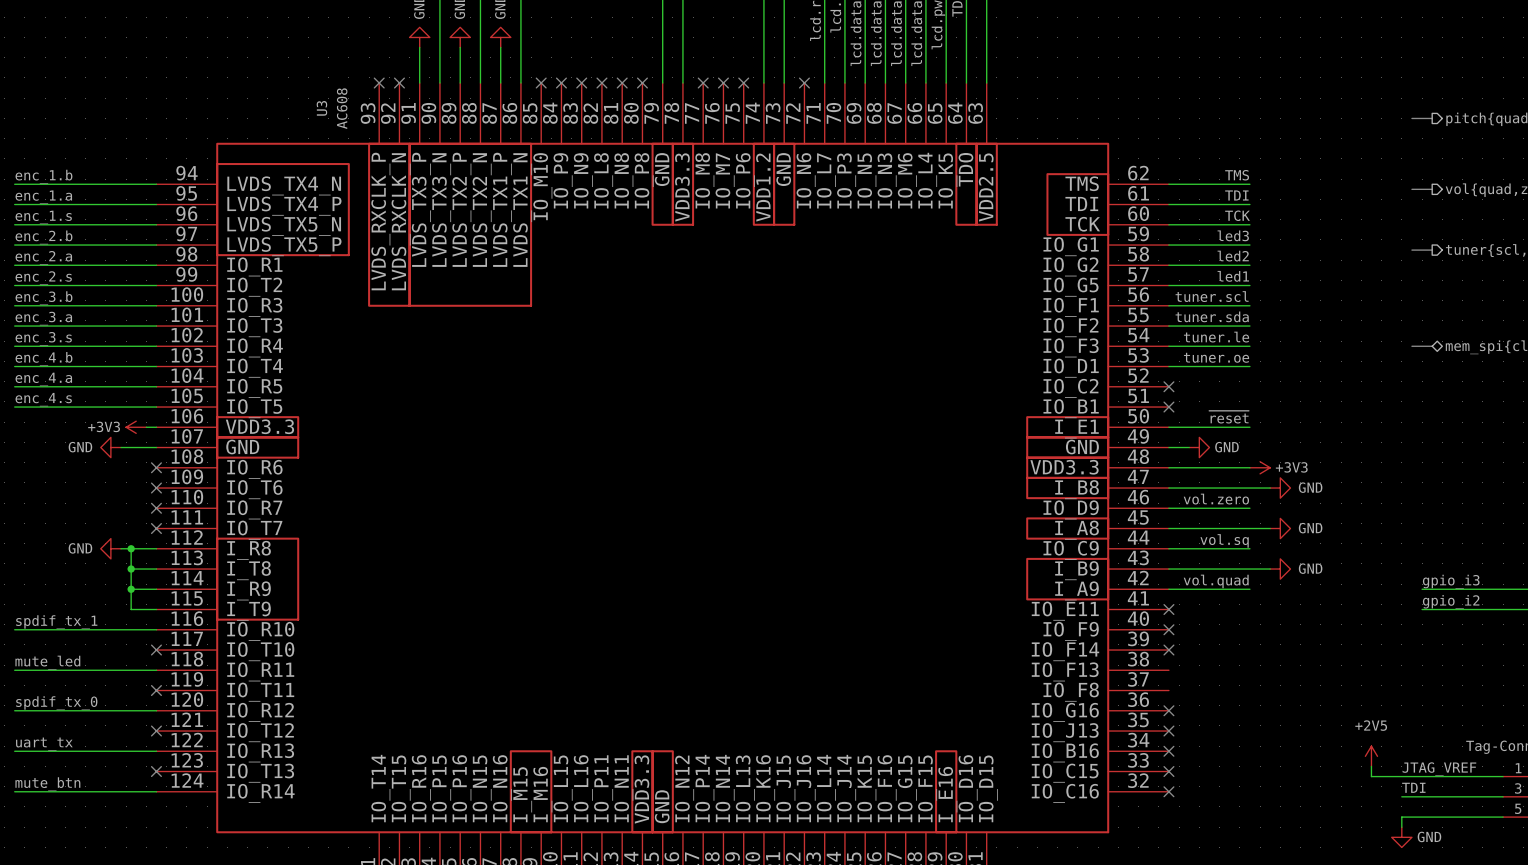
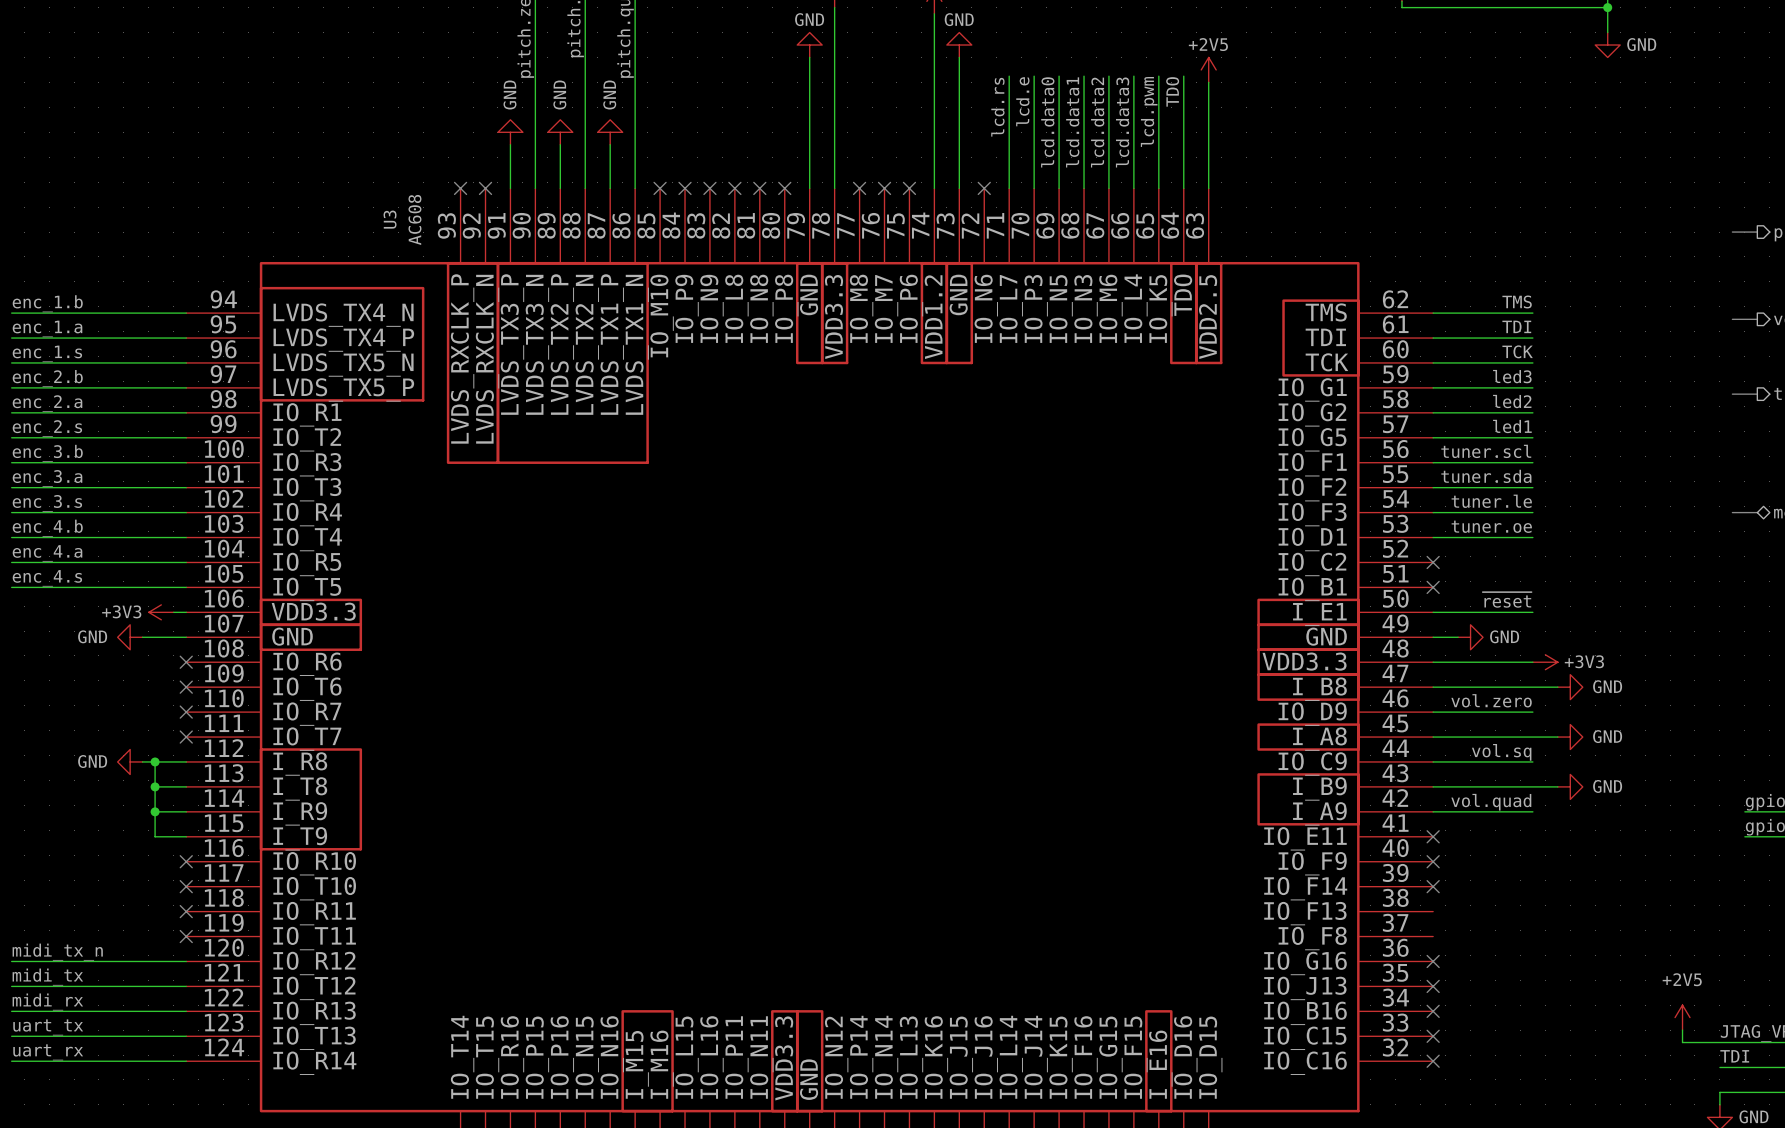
label: spdif_tx_1 (56, 622) -> none
wire: (14, 629) (156, 629) -> (11, 986) (186, 986)
no-connect mark: none -> (186, 861)
label: mute_led (47, 662) -> none
wire: (14, 670) (156, 670) -> (11, 1036) (186, 1036)
no-connect mark: none -> (186, 911)
label: spdif_tx_0 (56, 703) -> midi_tx_n (57, 952)
label: none -> midi_tx (47, 977)
no-connect mark: (156, 731) -> none
label: uart_tx (44, 744) -> midi_rx (47, 1001)
label: none -> uart_tx (48, 1027)
no-connect mark: (156, 771) -> none
label: mute_btn (47, 784) -> uart_rx (48, 1052)

